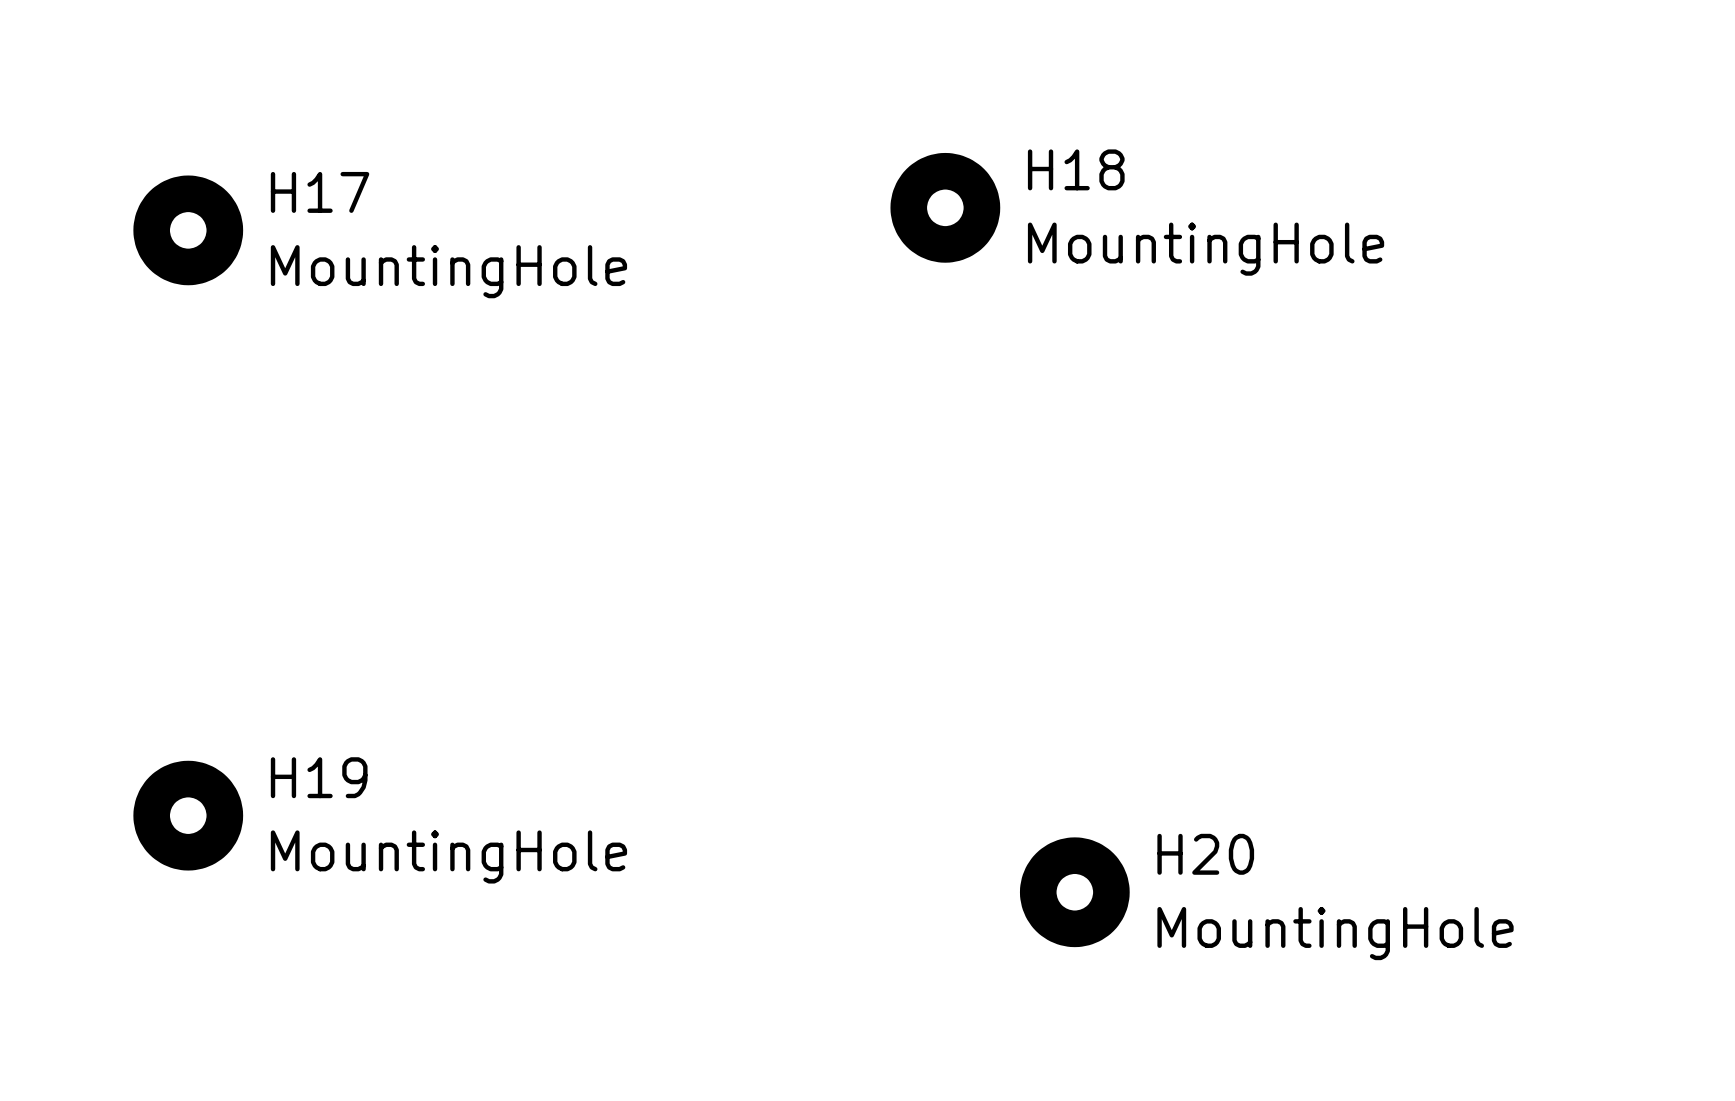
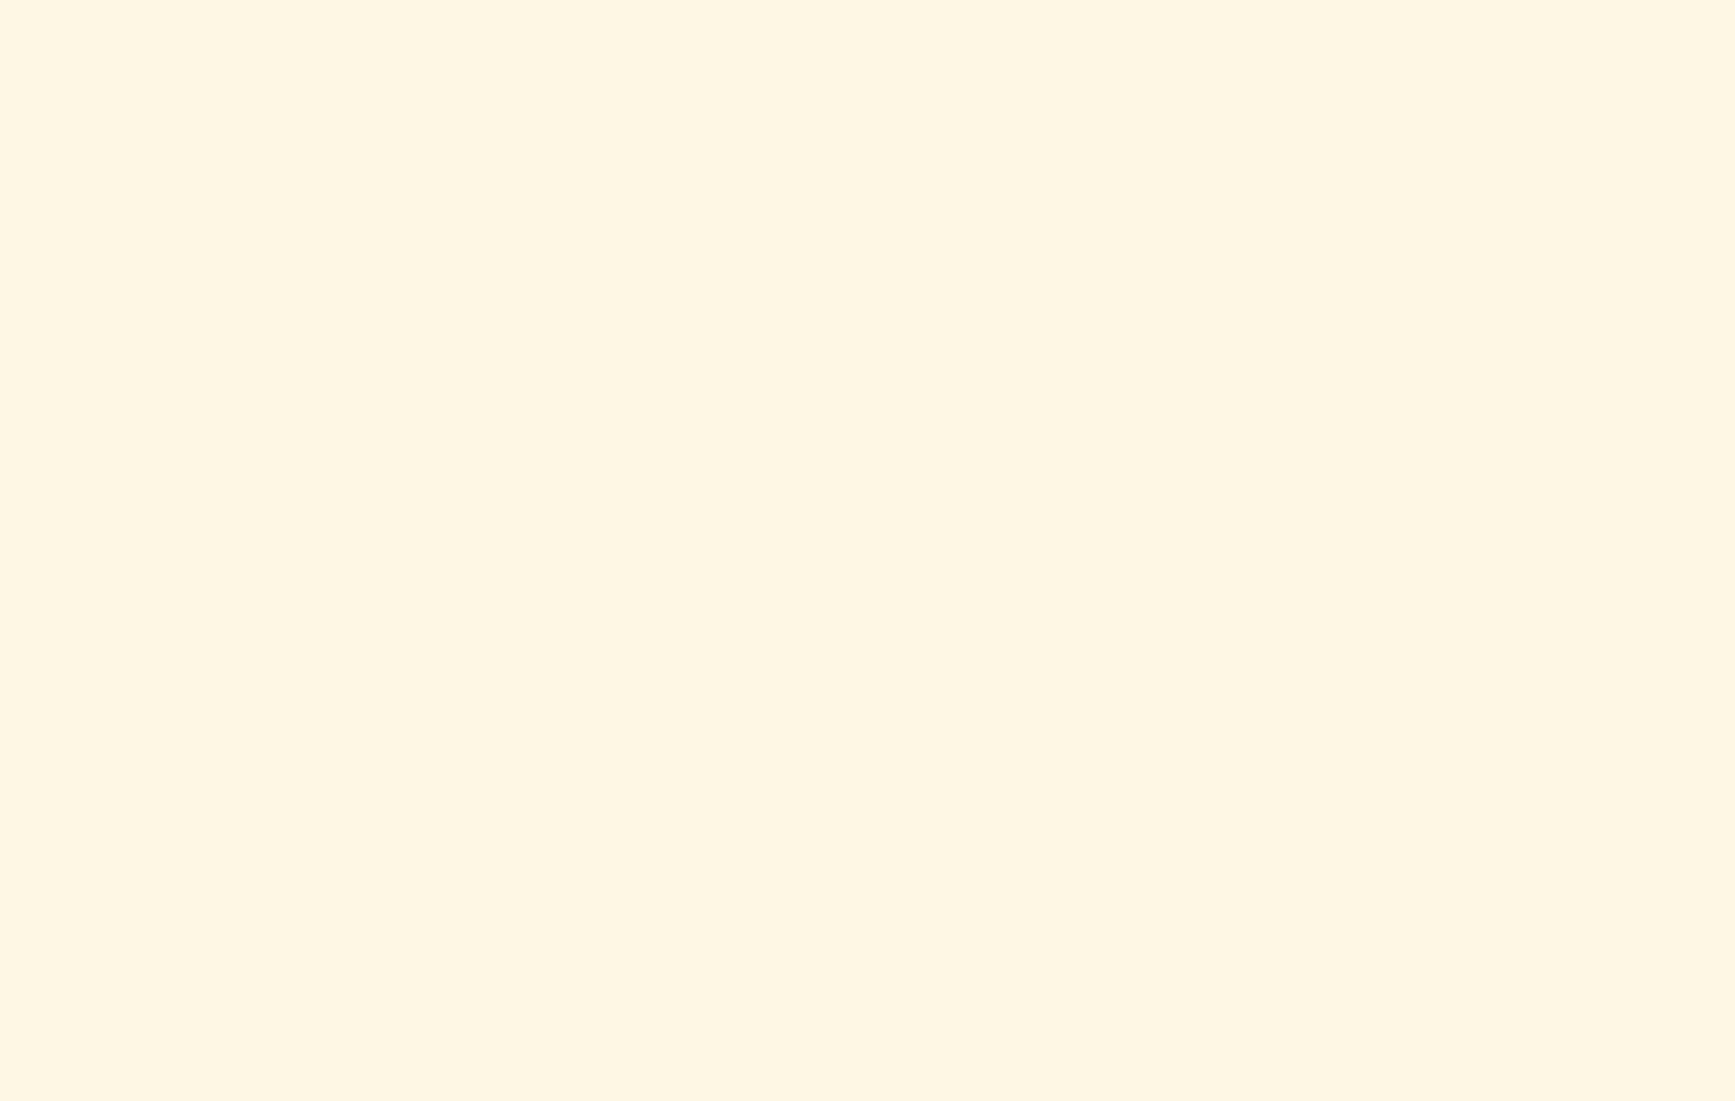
H18: MountingHole (945, 207) -> none
H17: MountingHole (188, 230) -> none
H19: MountingHole (188, 815) -> none
H20: MountingHole (1074, 892) -> none

